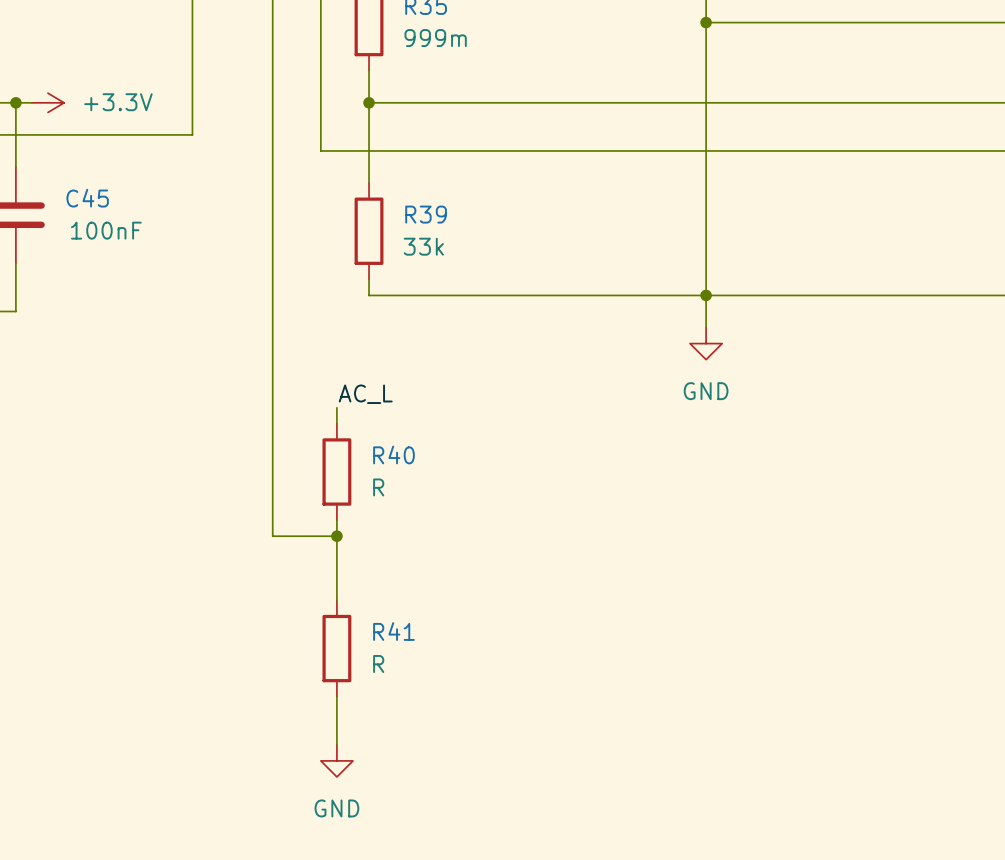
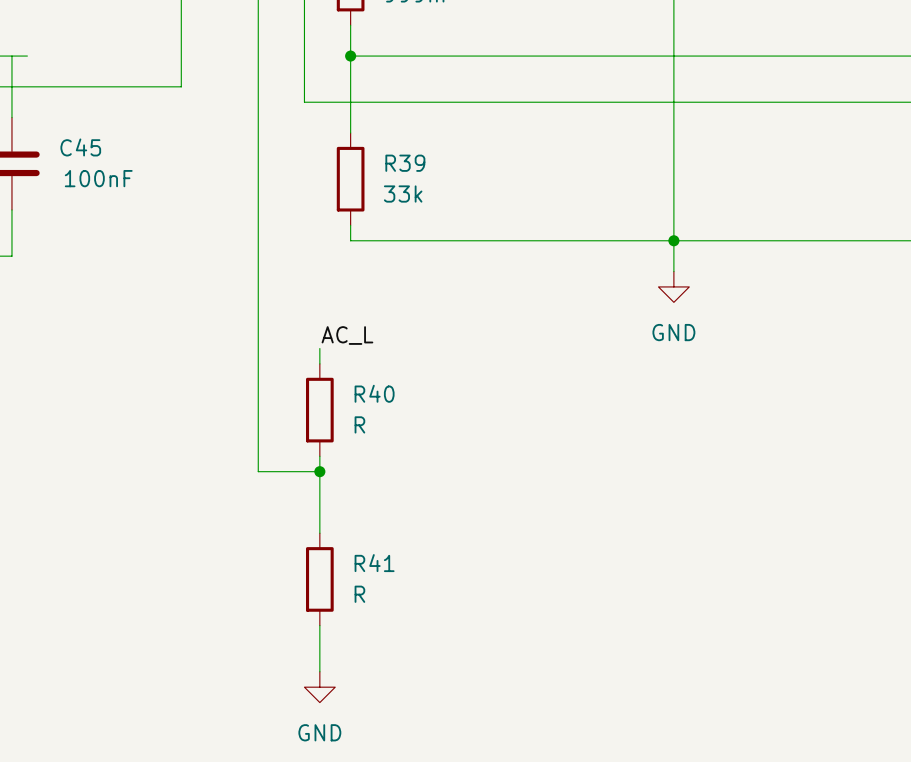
junction: (15, 102) -> none
power symbol: +3.3V (48, 102) -> none

